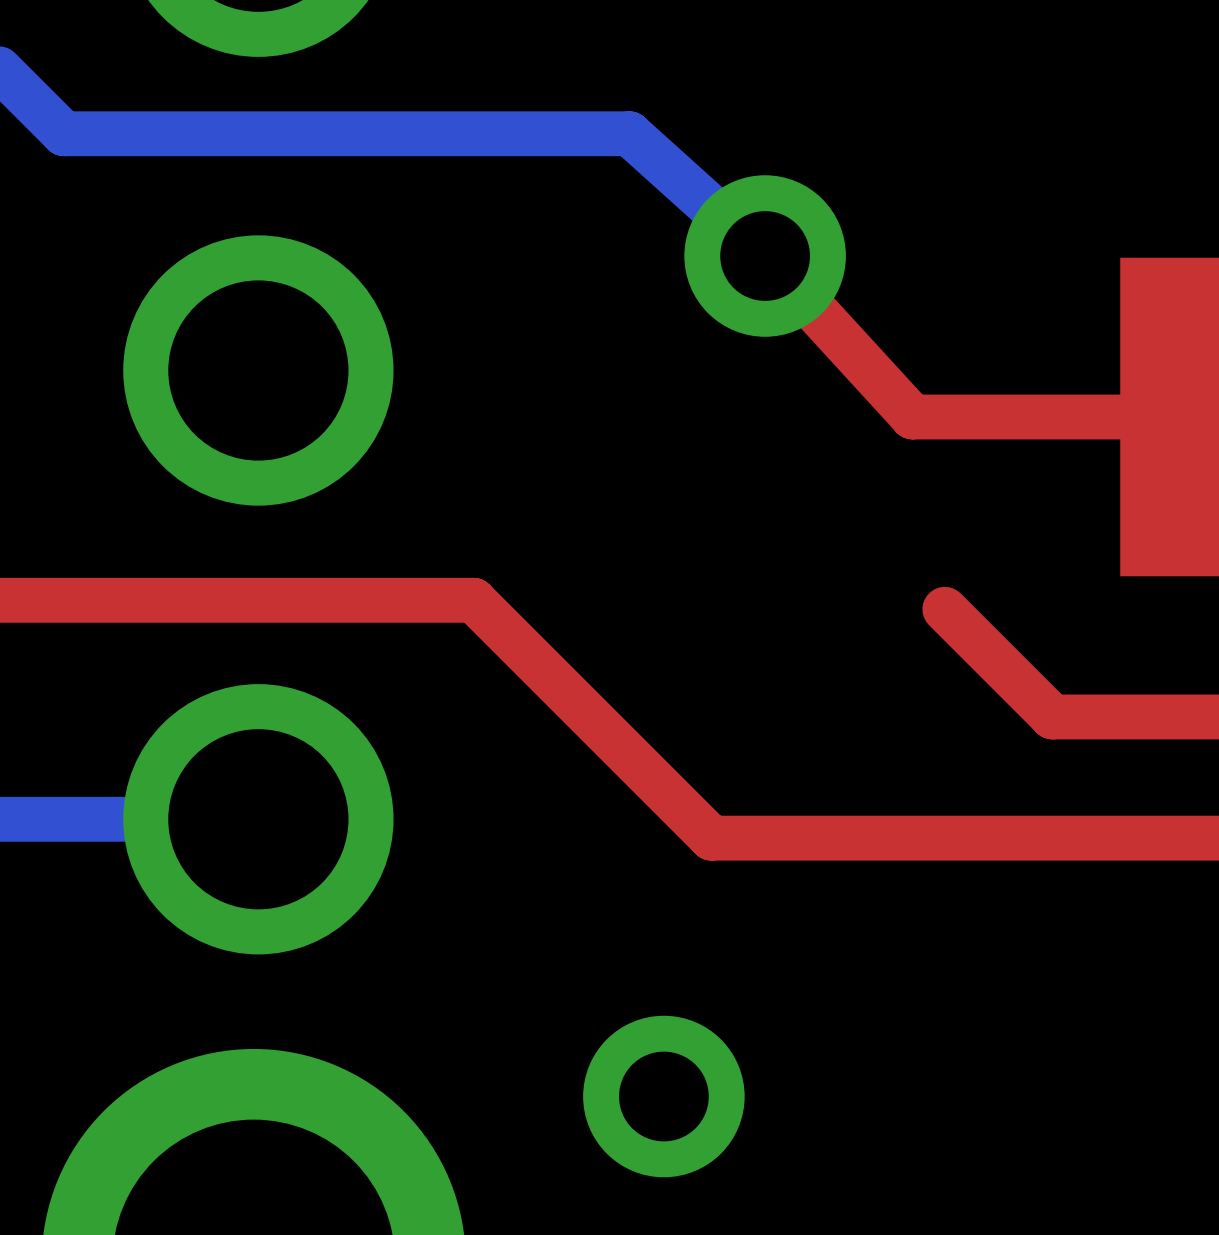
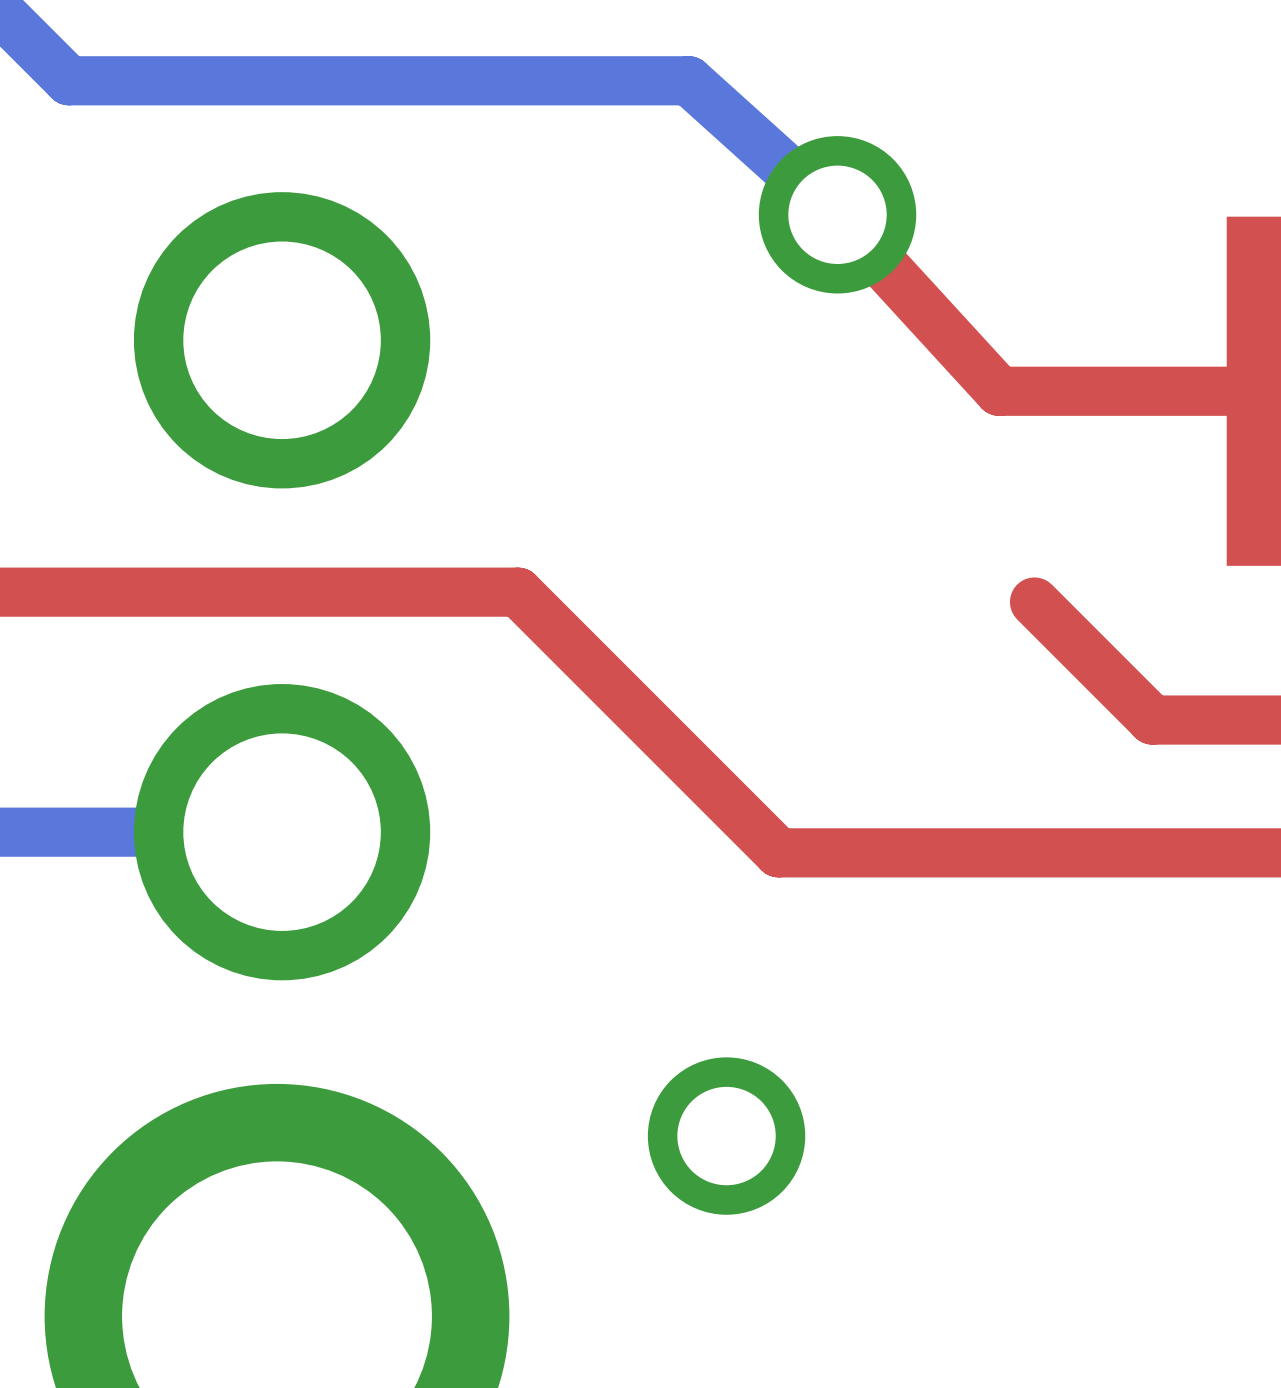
via size: [684, 175, 846, 337] -> [758, 136, 917, 294]
via size: [583, 1015, 745, 1178] -> [647, 1057, 806, 1215]

